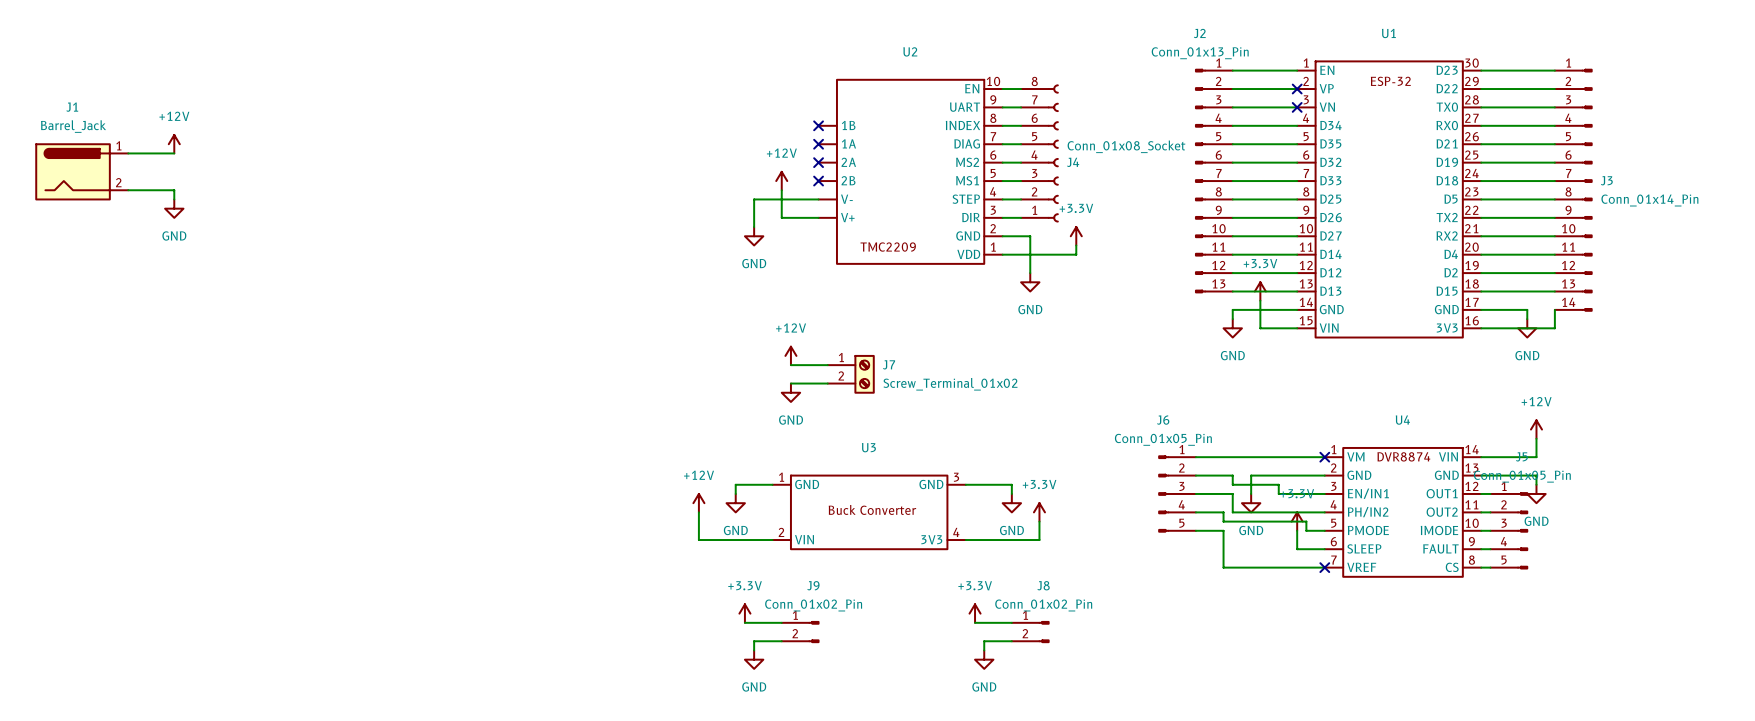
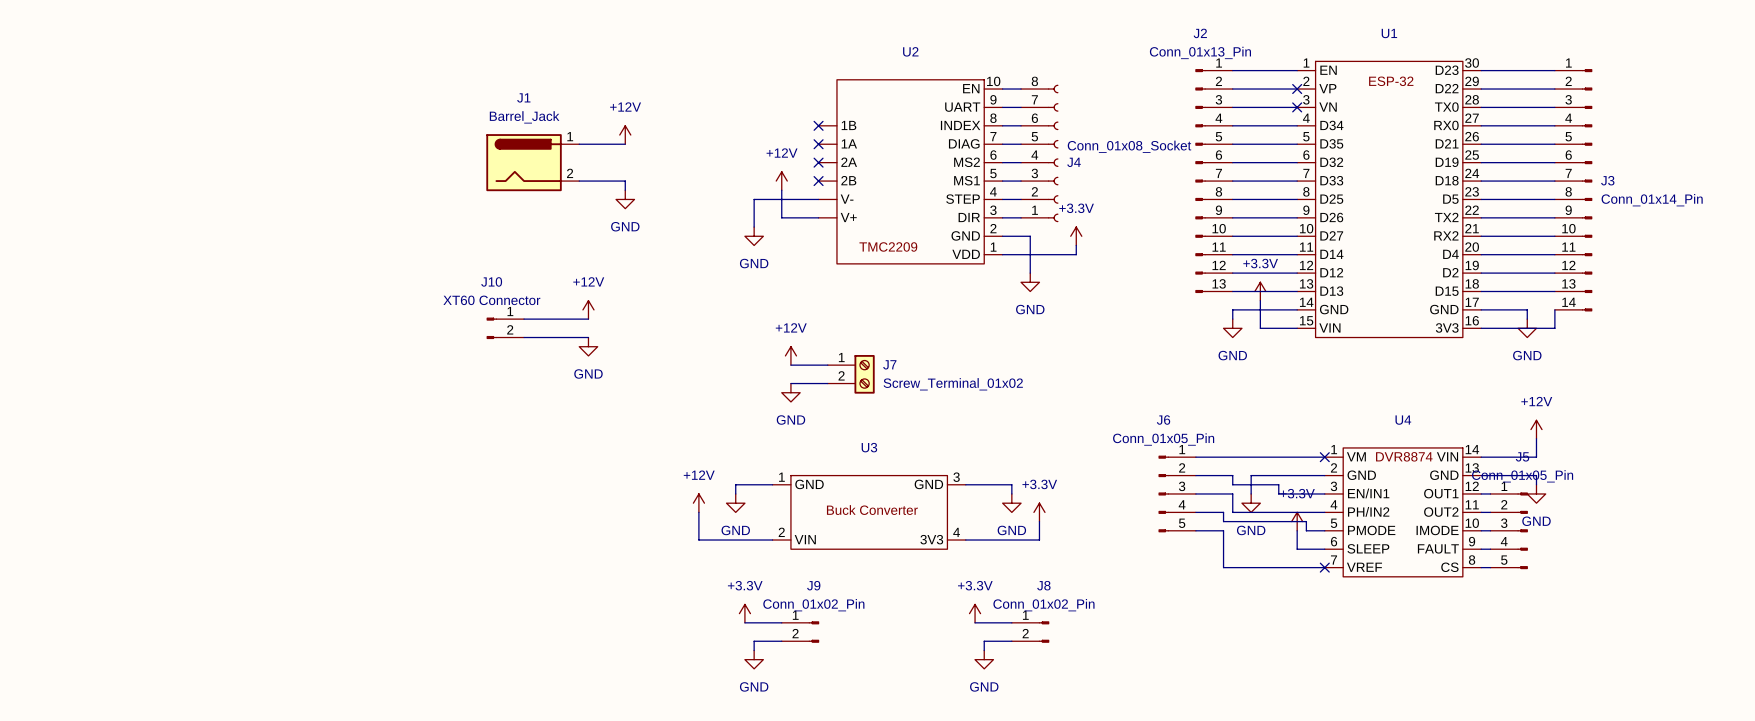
power symbol: none -> +12V (625, 135)
power symbol: +12V (174, 144) -> none
wire: none -> (579, 144) (625, 144)
wire: (128, 153) (174, 153) -> none
J1 position: (81, 171) -> (532, 162)
wire: none -> (579, 181) (625, 181) (625, 190)
wire: (128, 190) (174, 190) (174, 199) -> none
power symbol: none -> GND (625, 199)
power symbol: GND (174, 208) -> none
power symbol: none -> +12V (588, 309)
wire: none -> (524, 319) (588, 319)
J10: none -> XT60 Connector (505, 328)
wire: none -> (524, 337) (588, 337)
power symbol: none -> GND (588, 346)

